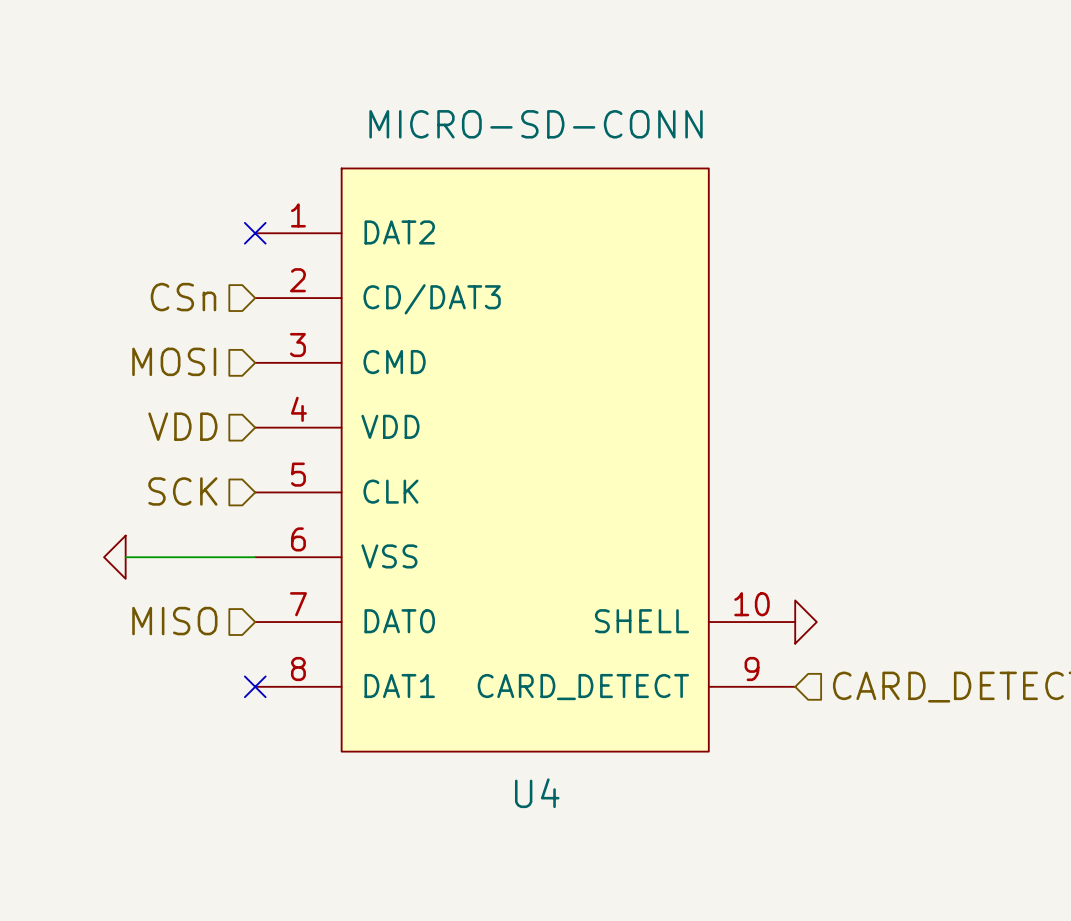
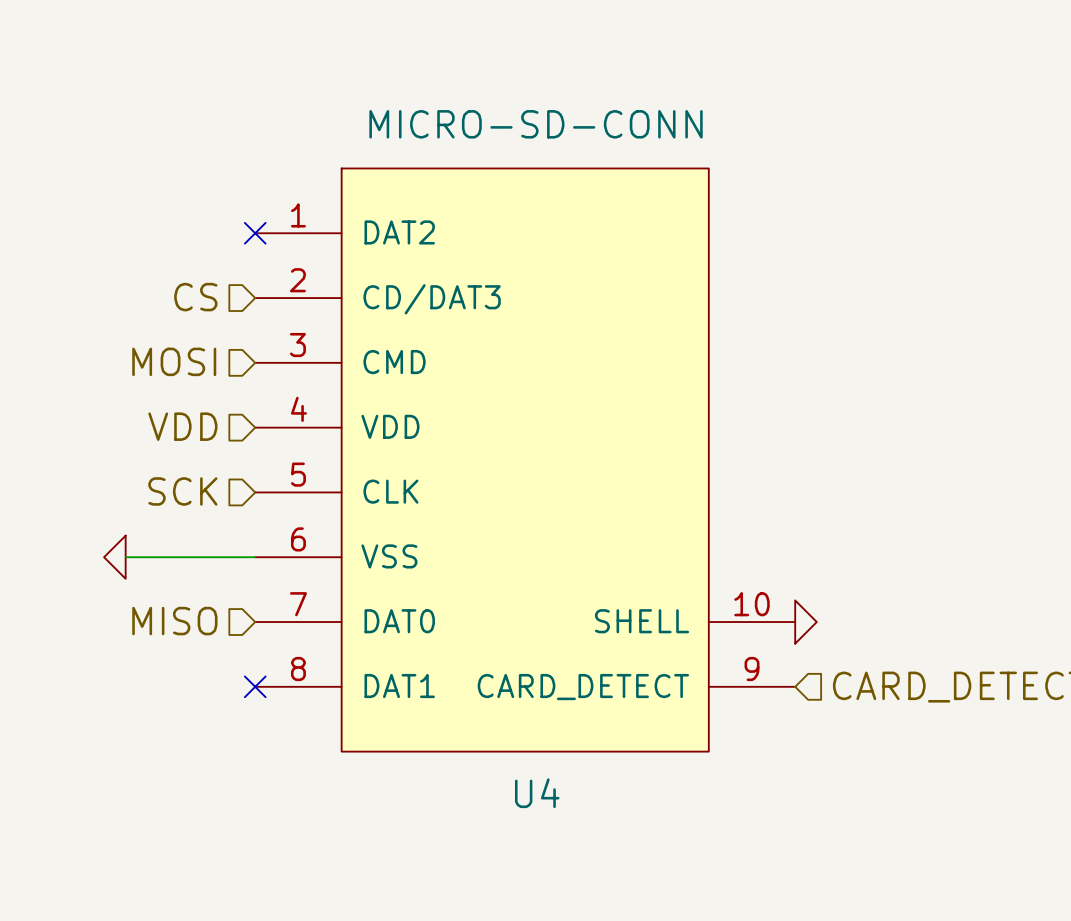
hierarchical label: CSn (183, 297) -> CS (195, 297)

